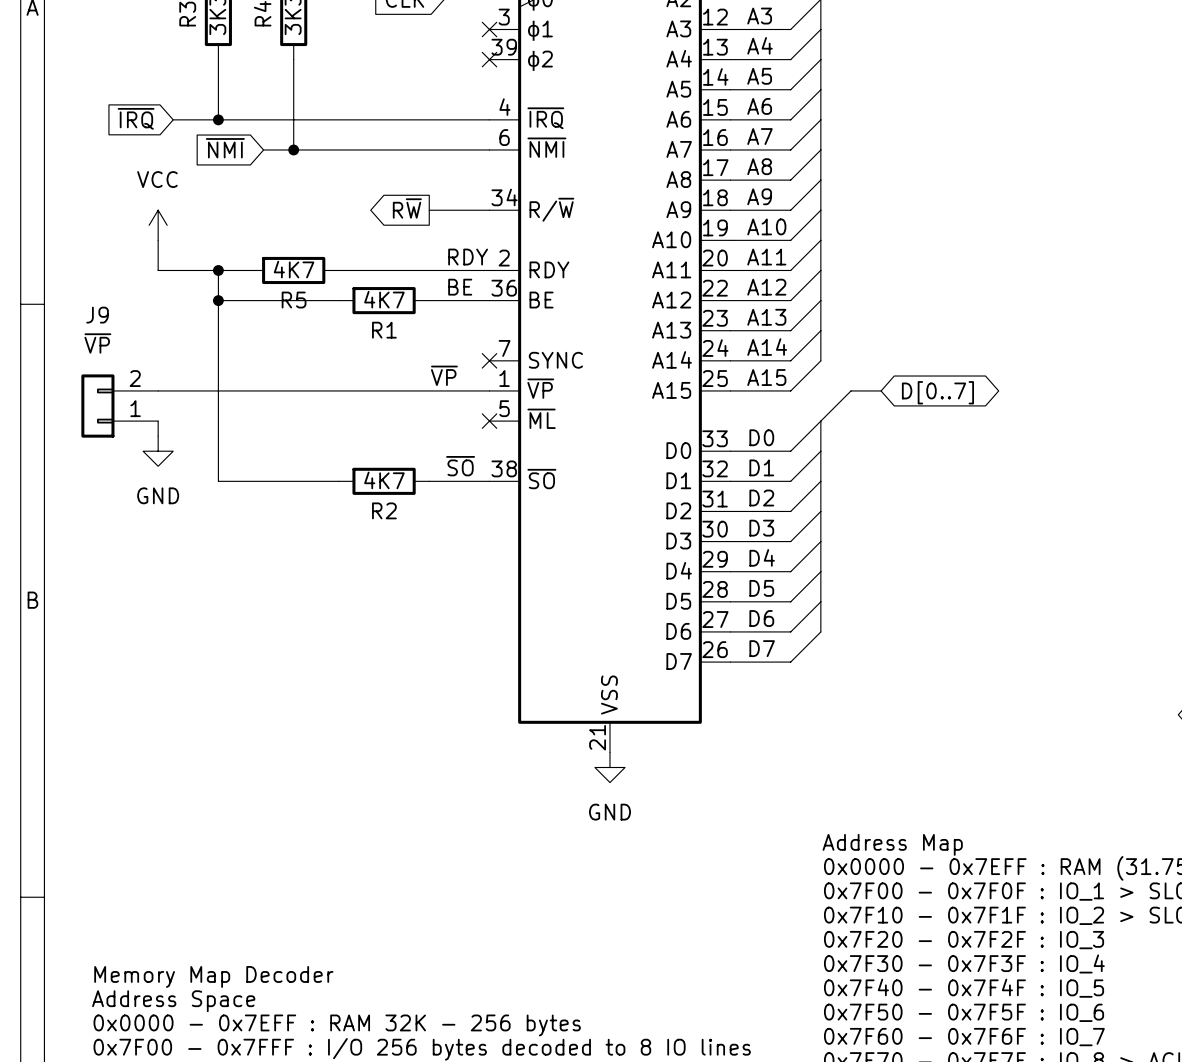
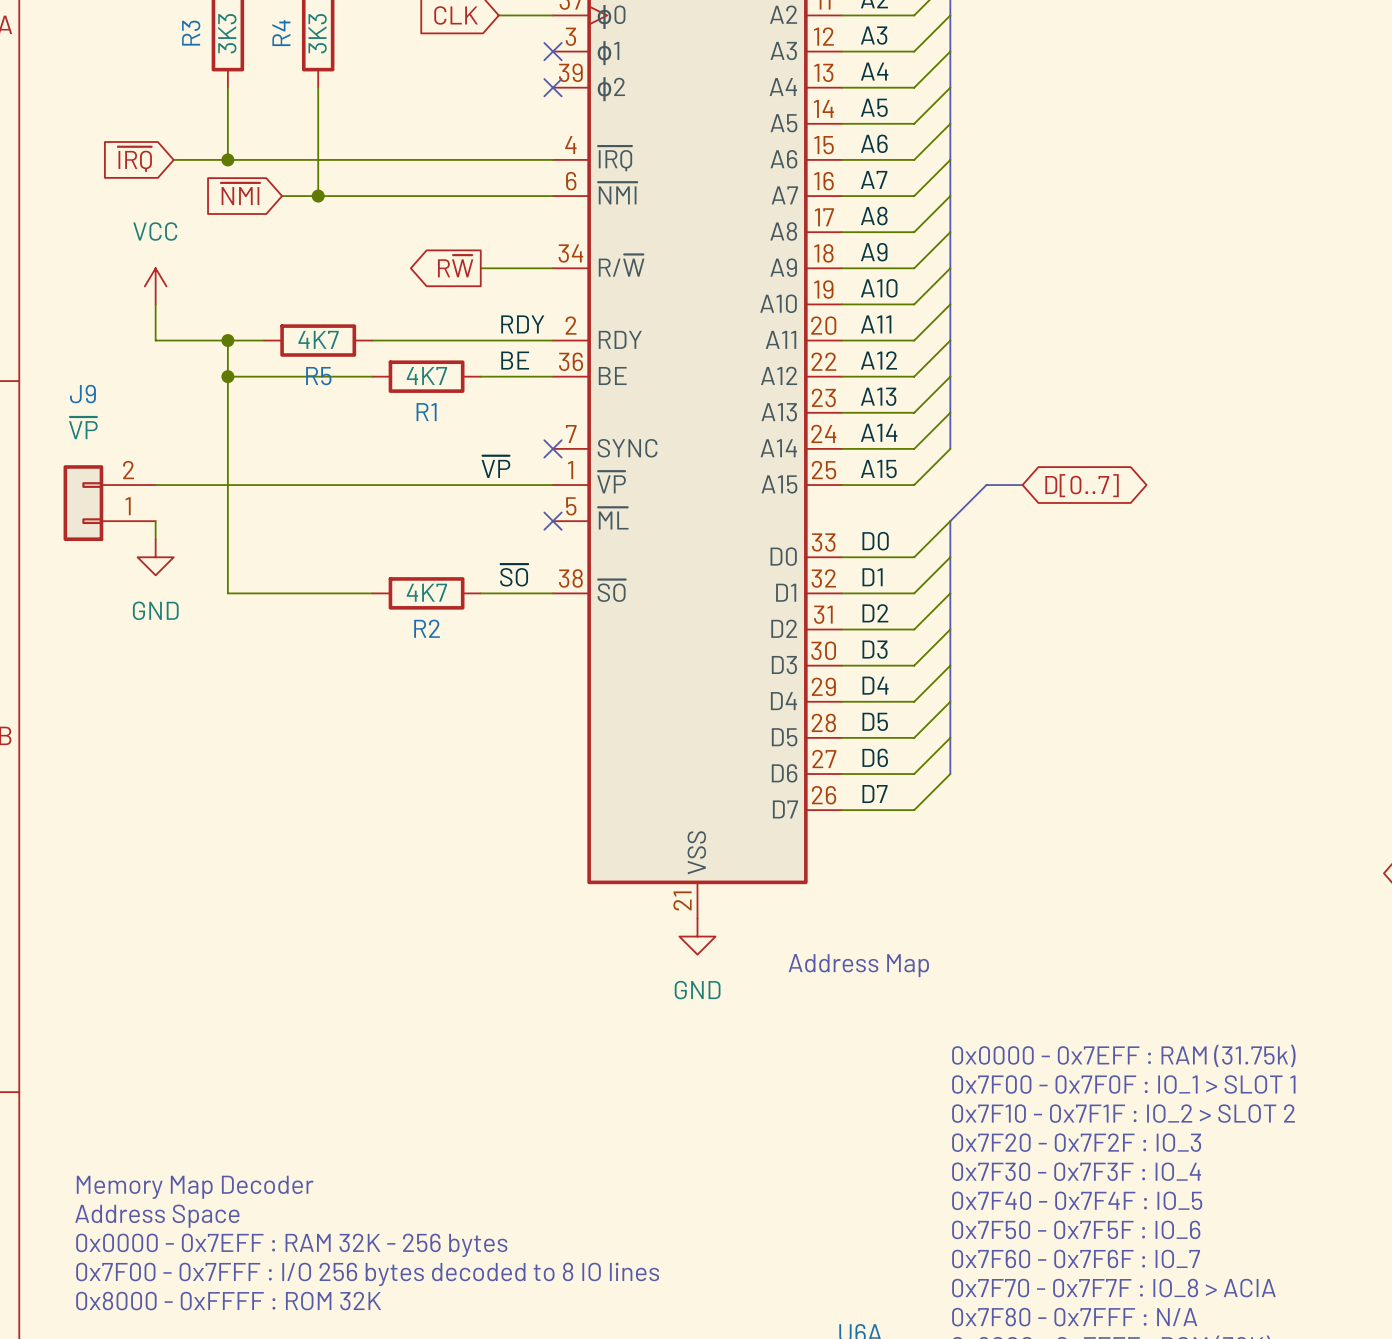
text position: Address Map (892, 844) -> Address Map (858, 965)

